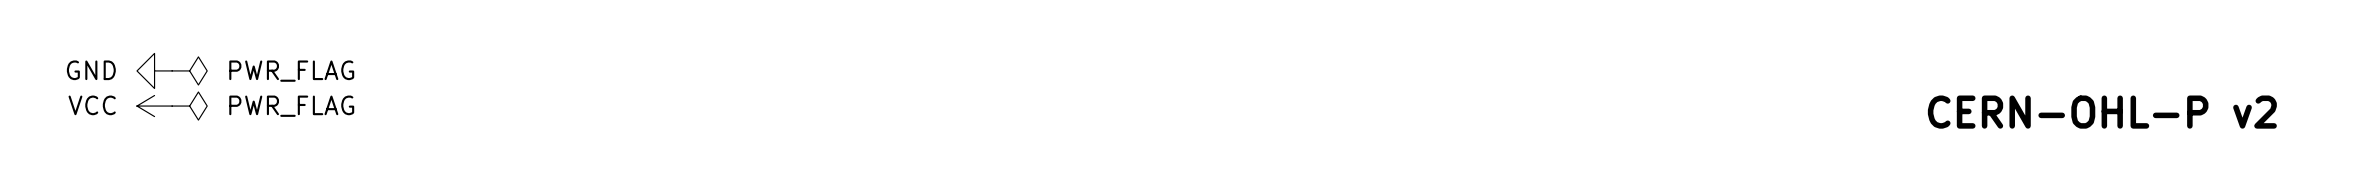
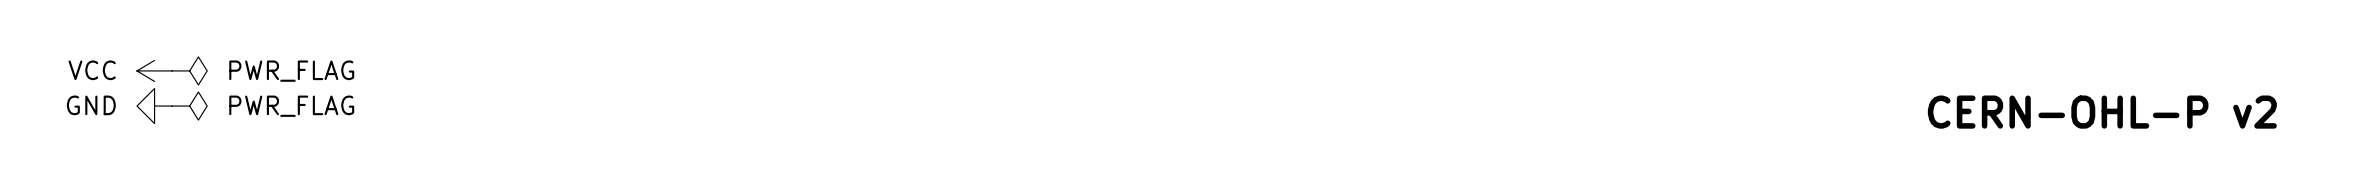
power symbol: GND (154, 70) -> VCC (154, 70)
power symbol: VCC (154, 106) -> GND (154, 106)

